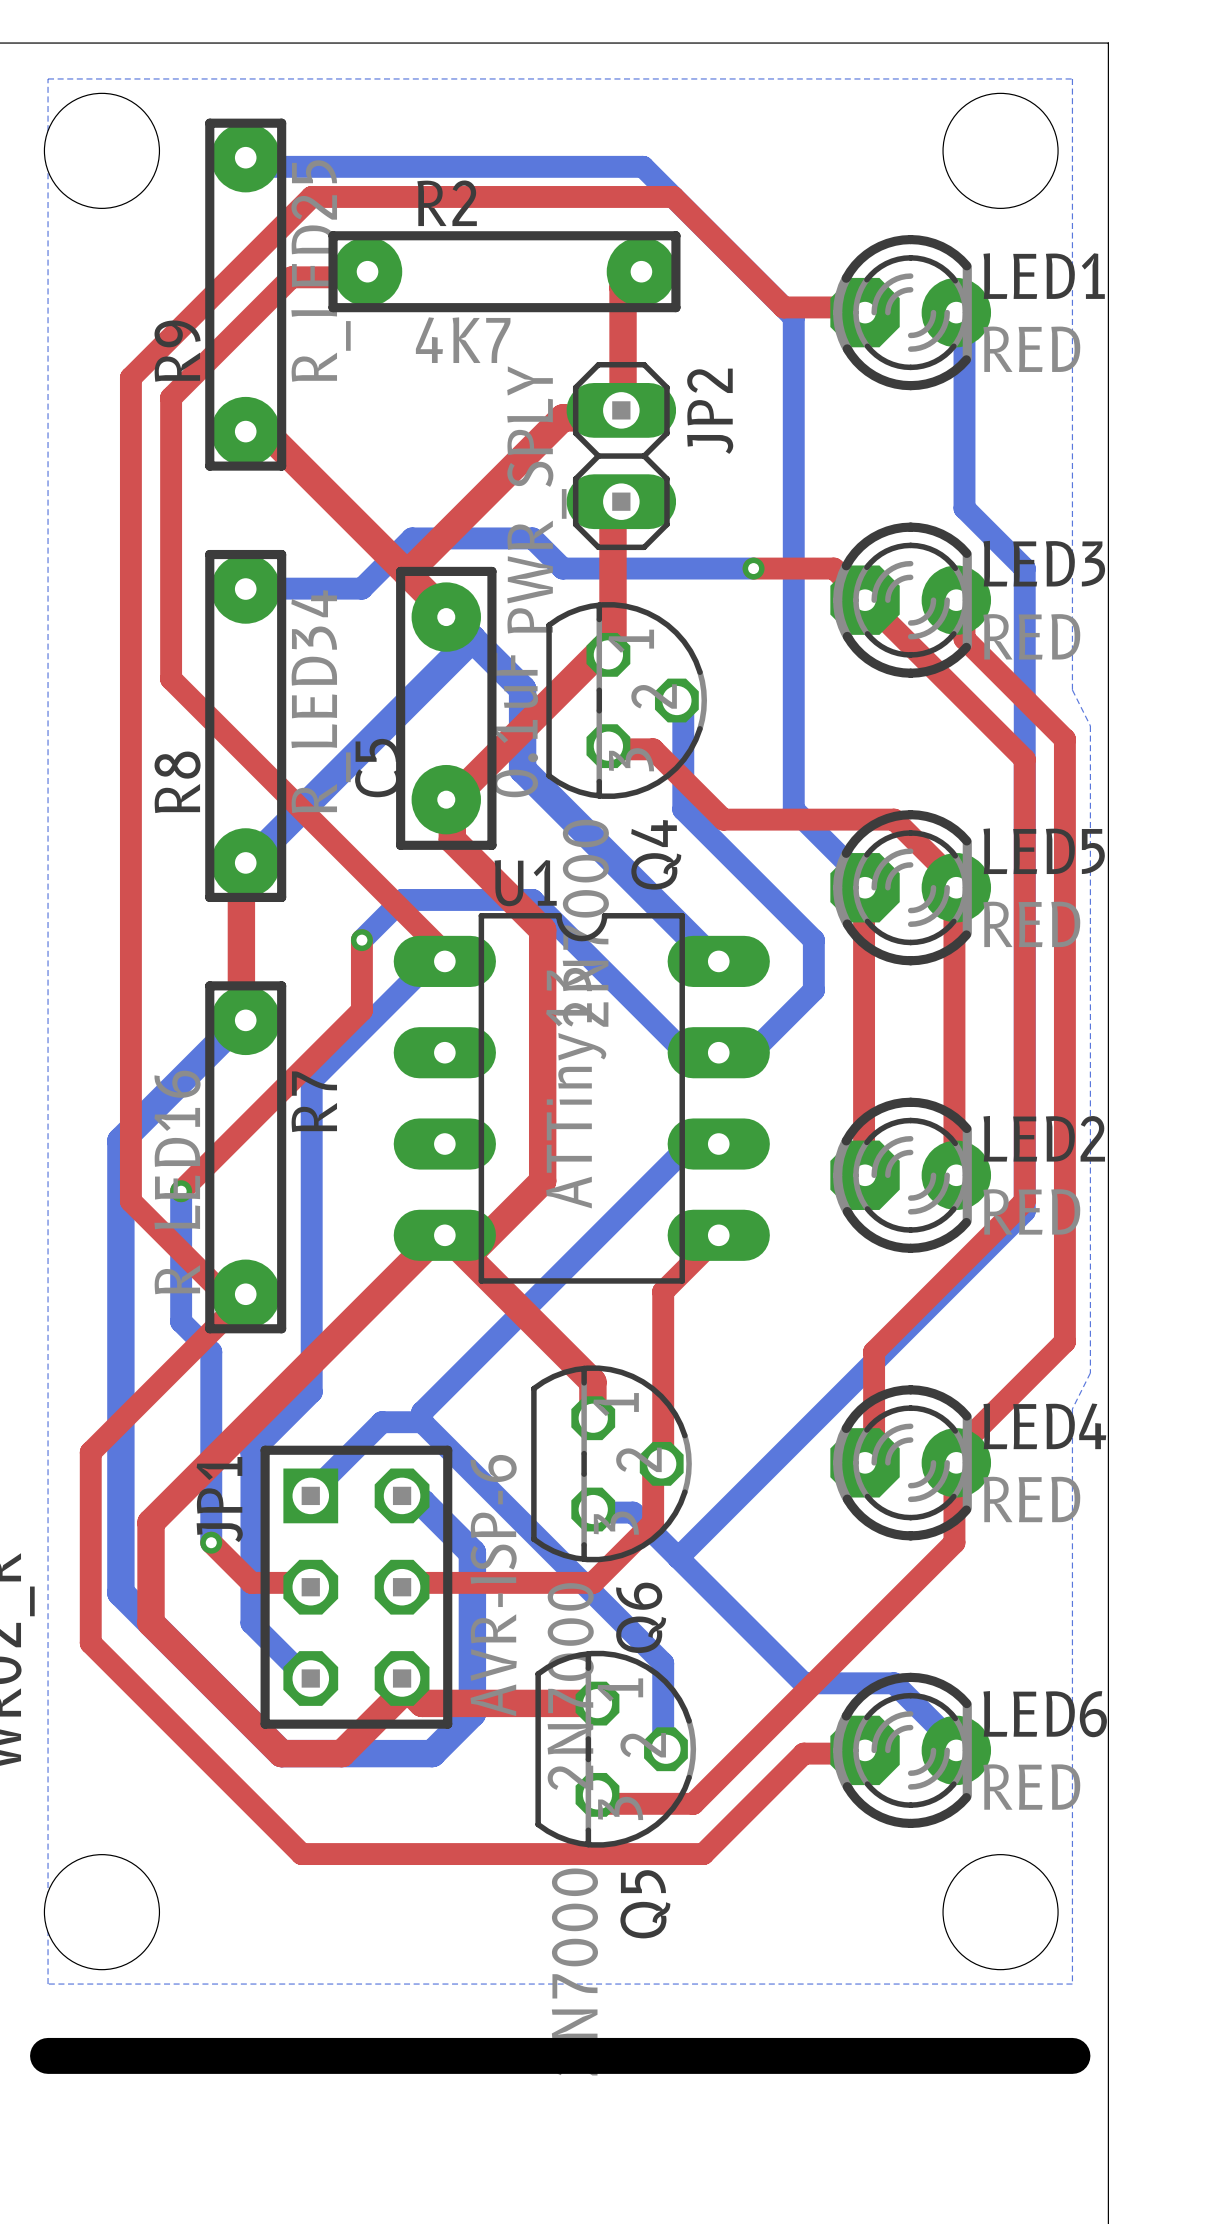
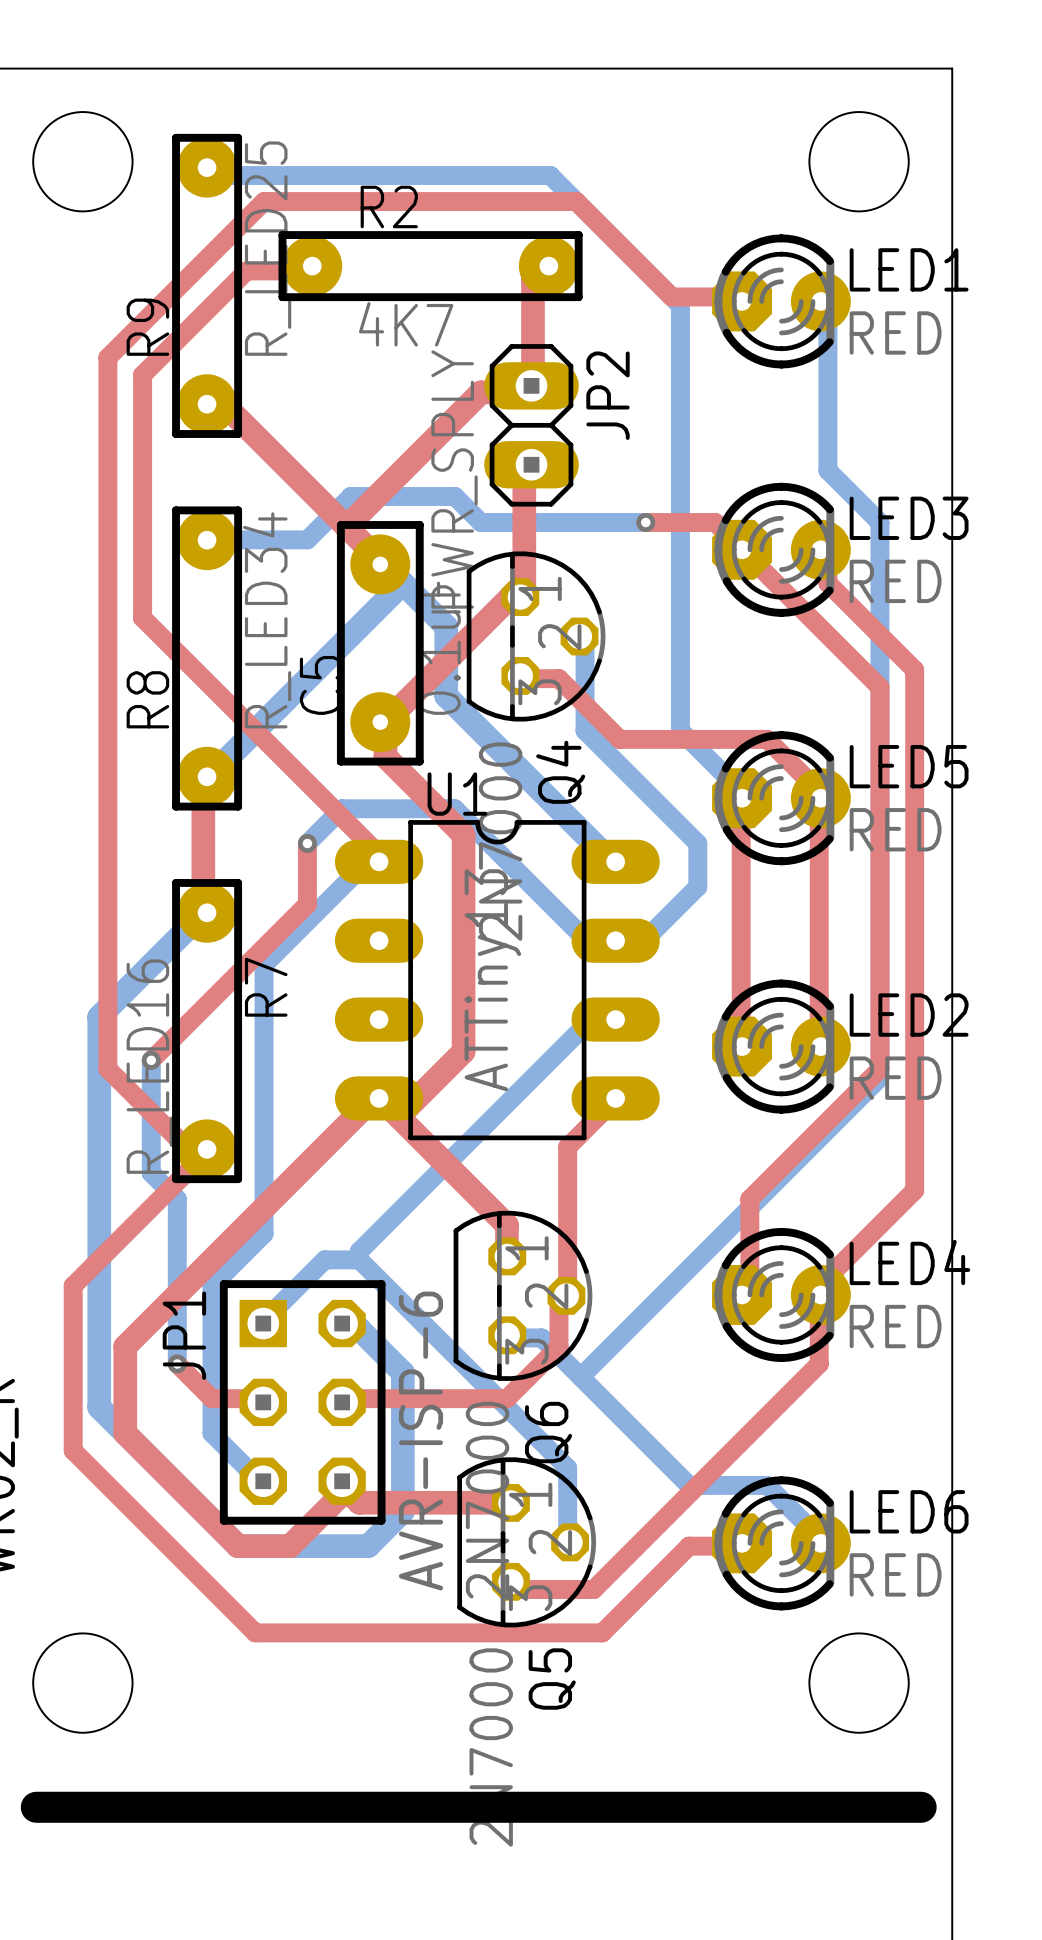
bottom zone outline: (48, 78) (48, 1984) (1072, 1984) (1072, 1408) (1090, 1372) (1090, 725) (1072, 690) (1072, 78) (48, 78) -> none

